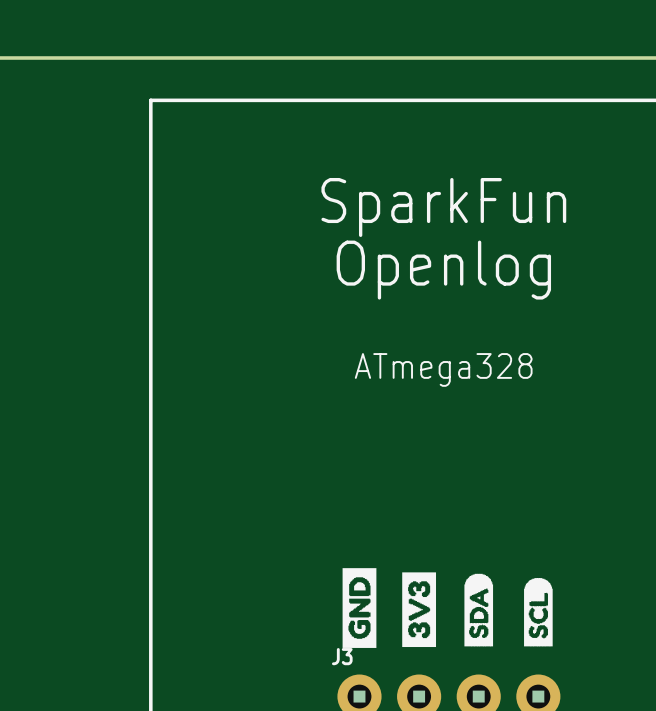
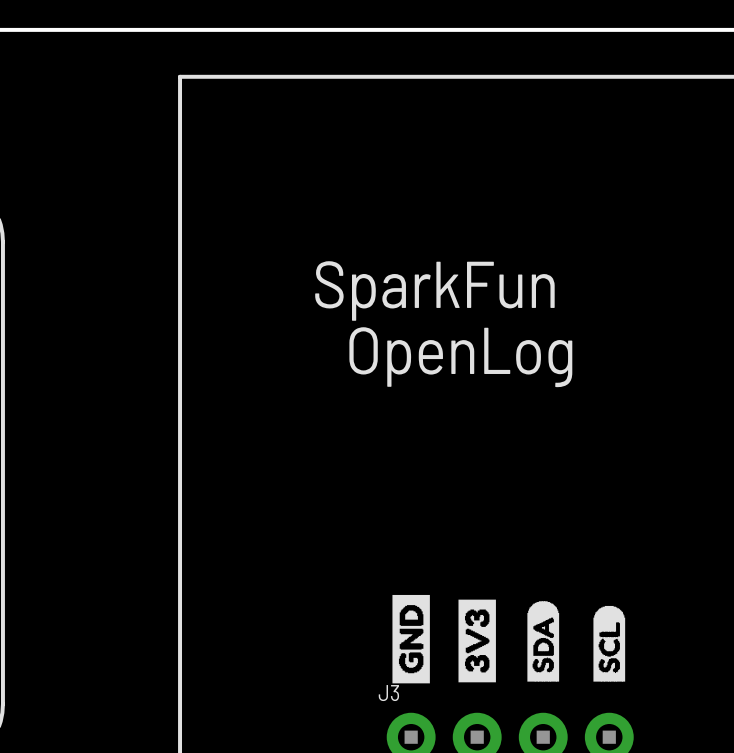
text position: SparkFun (443, 207) -> SparkFun (434, 290)
text: Openlog (443, 270) -> OpenLog (460, 357)
text: ATmega328 (443, 369) -> none

